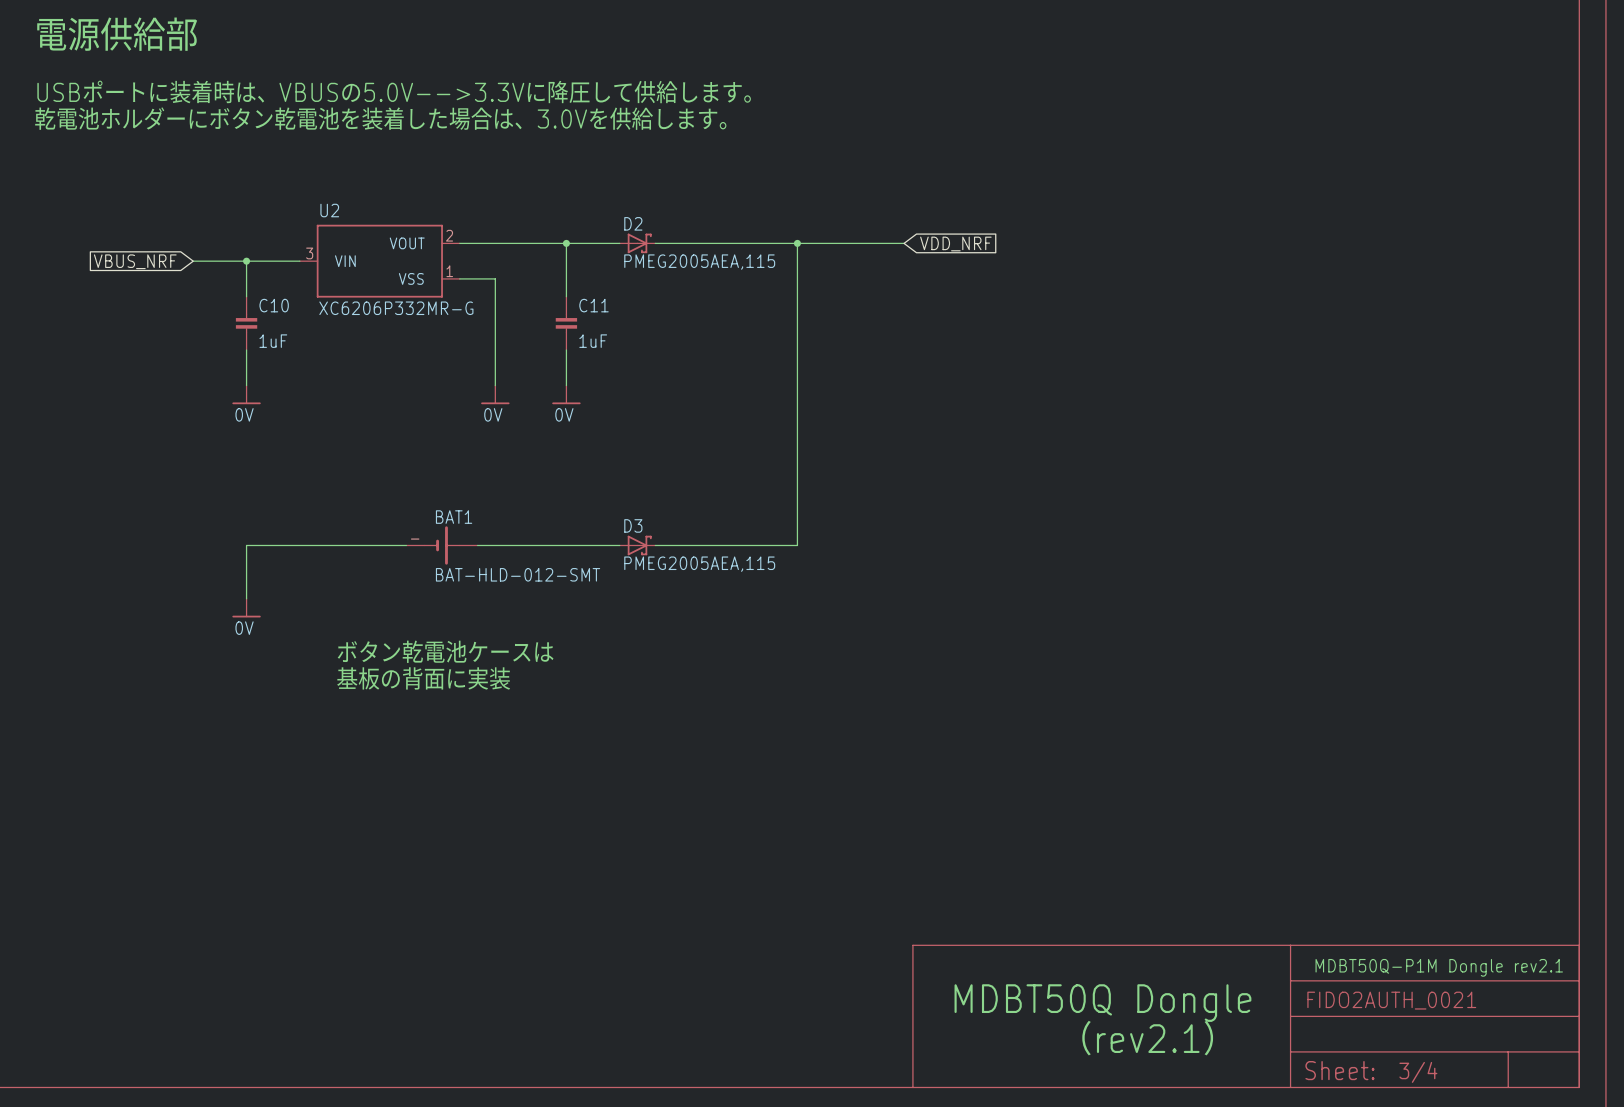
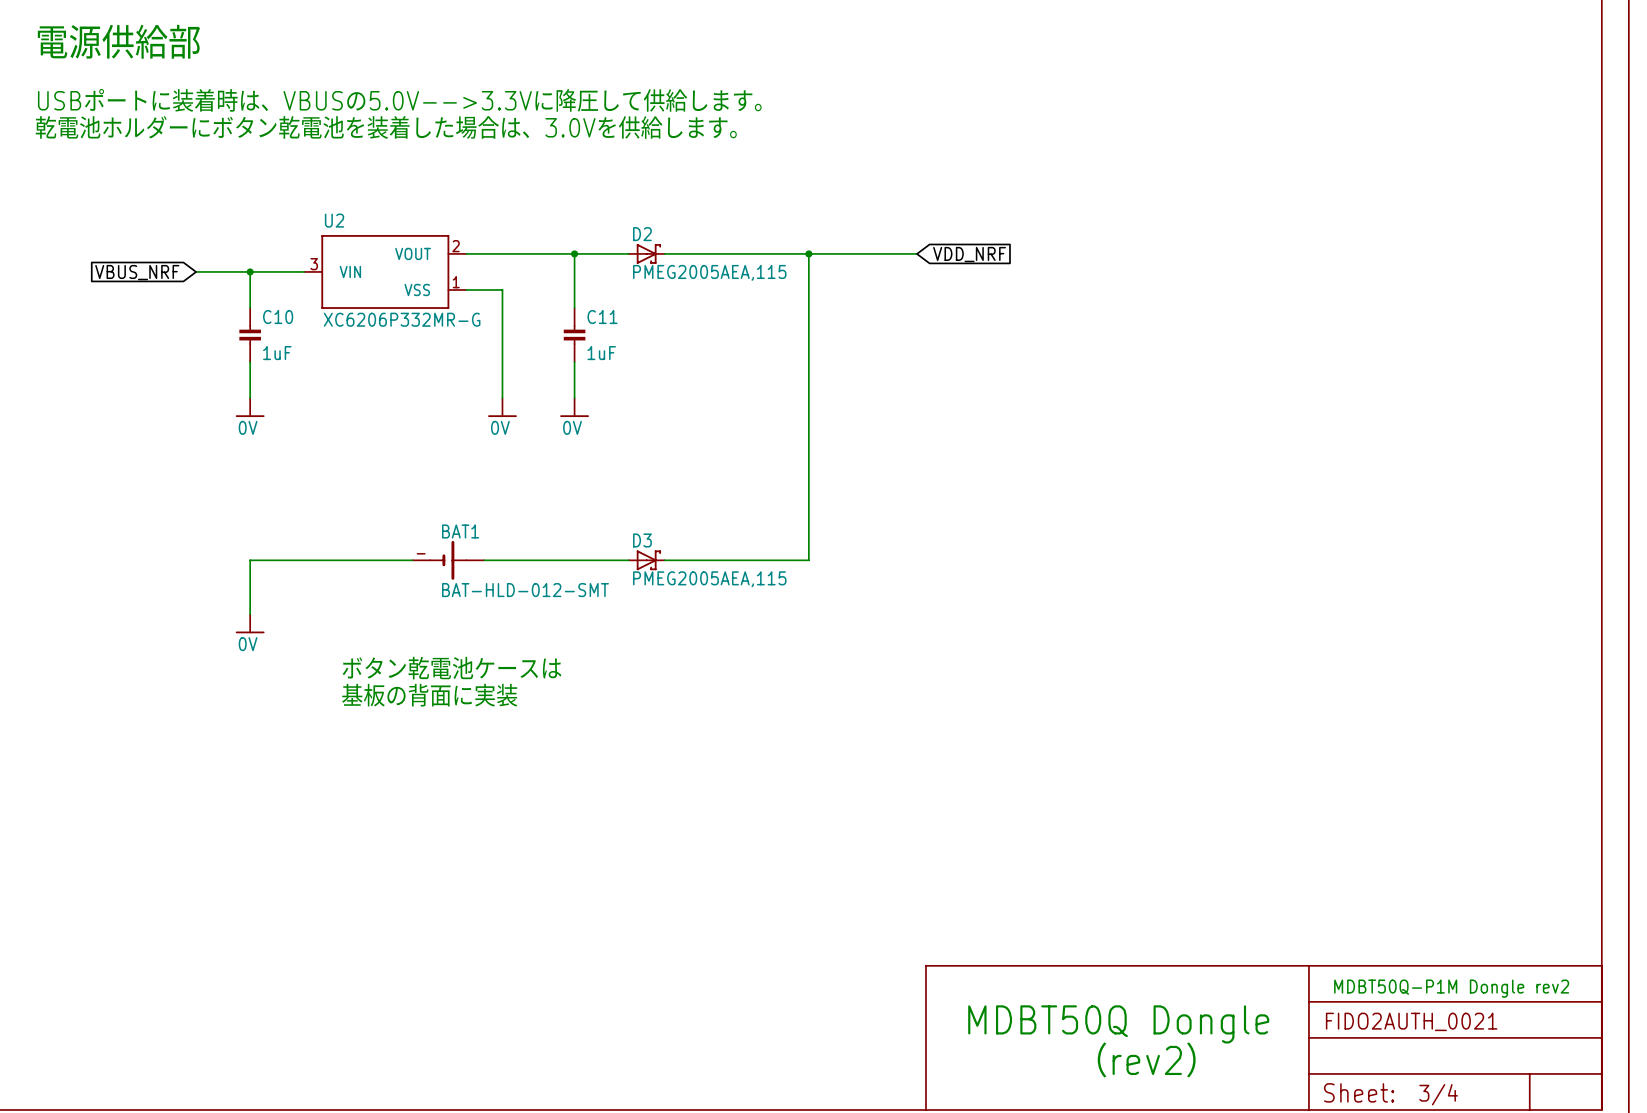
text: MDBT50Q-P1M Dongle rev2.1 (1439, 967) -> MDBT50Q-P1M Dongle rev2 (1451, 988)
text: （rev2.1） (1147, 1038) -> （rev2） (1146, 1059)

